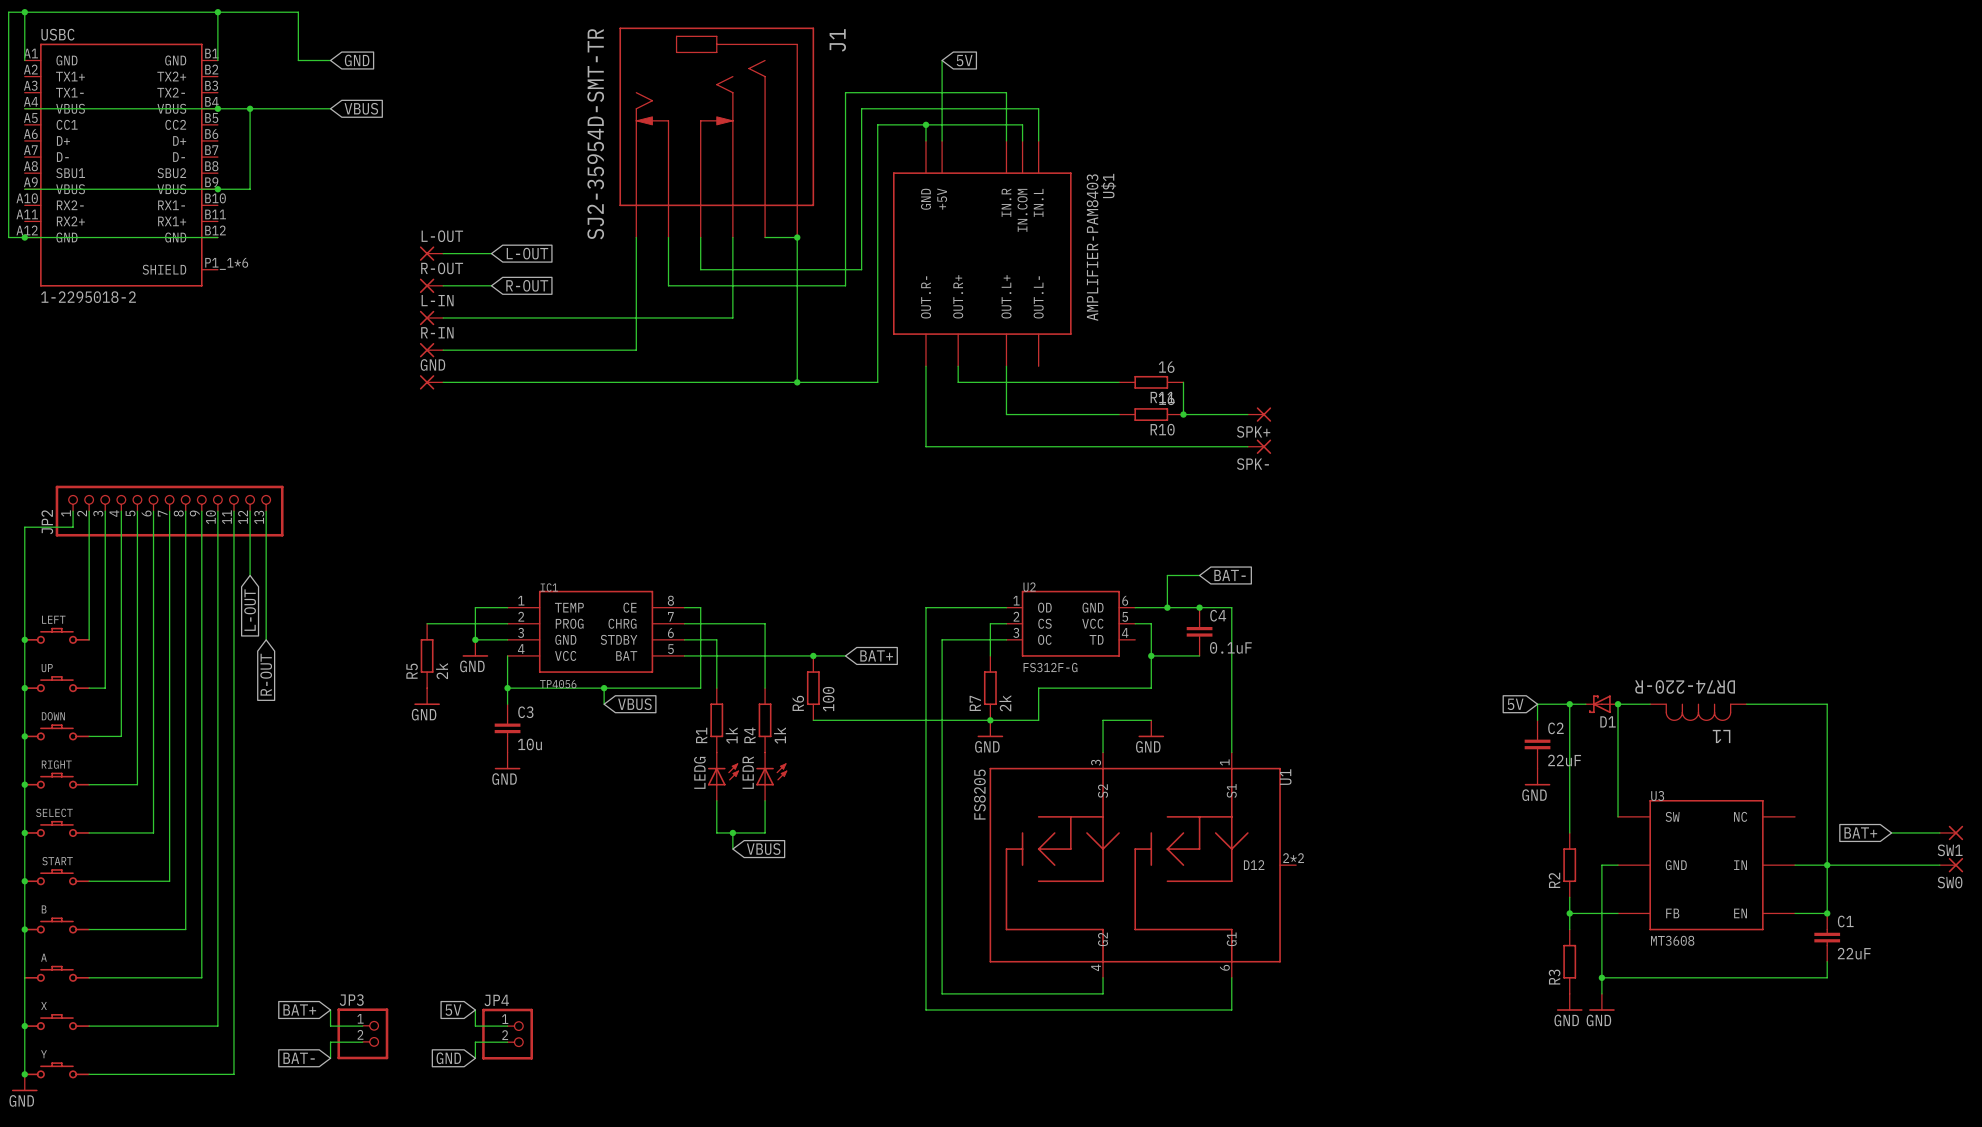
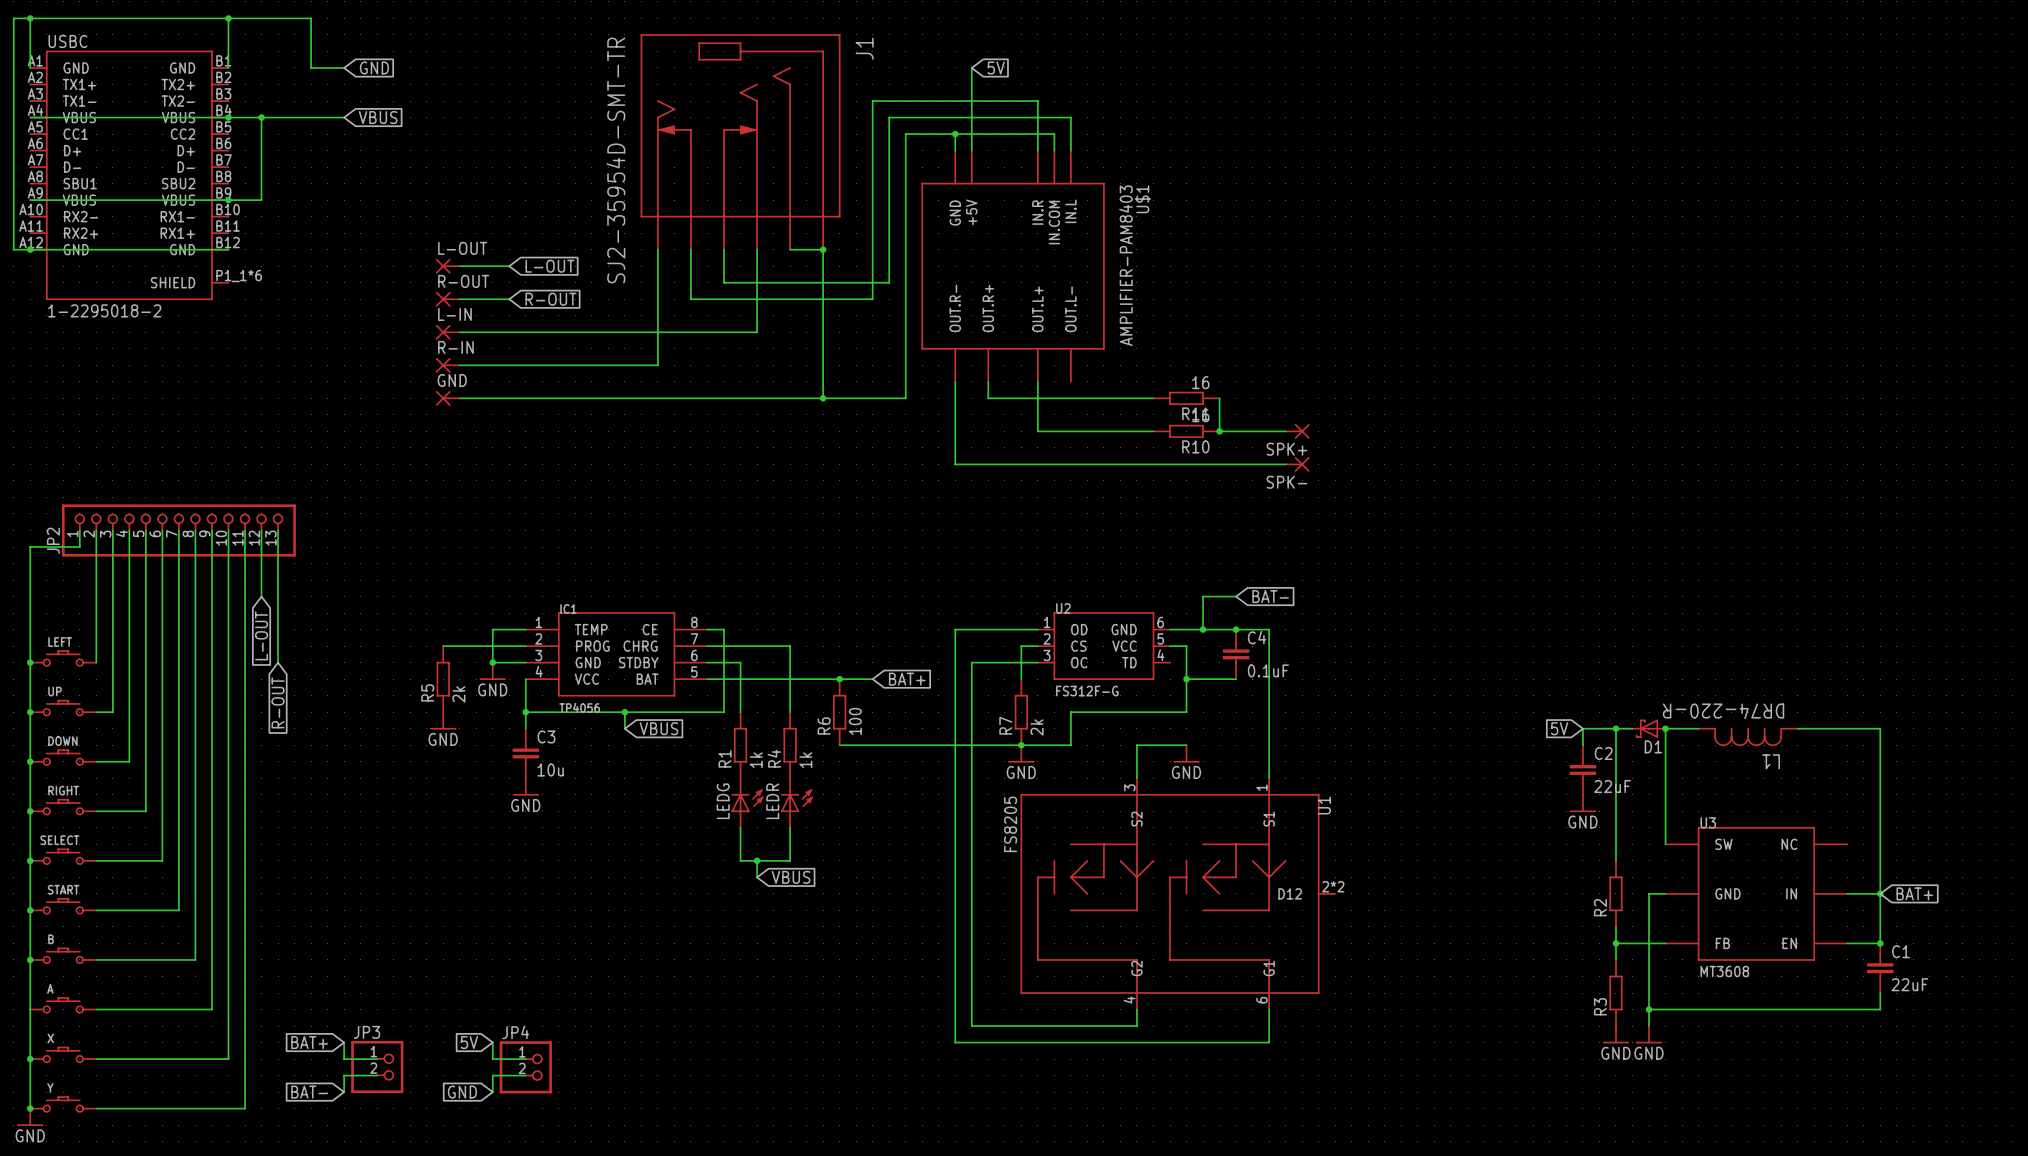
global label rotation: 0° (1860, 832) -> 180° (1914, 893)
wire: (1891, 832) (1939, 832) -> none
SW1: (1951, 832) -> none
wire: (1827, 865) (1939, 865) -> none
SW0: (1951, 865) -> none

